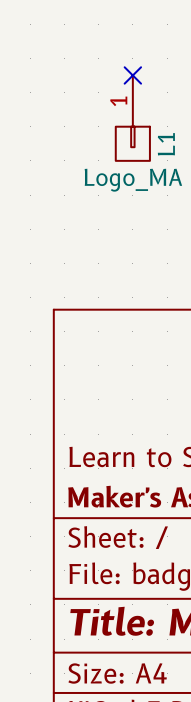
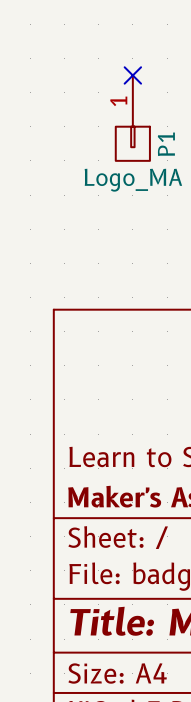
L1 name: L1 (166, 144) -> P1 (166, 144)

